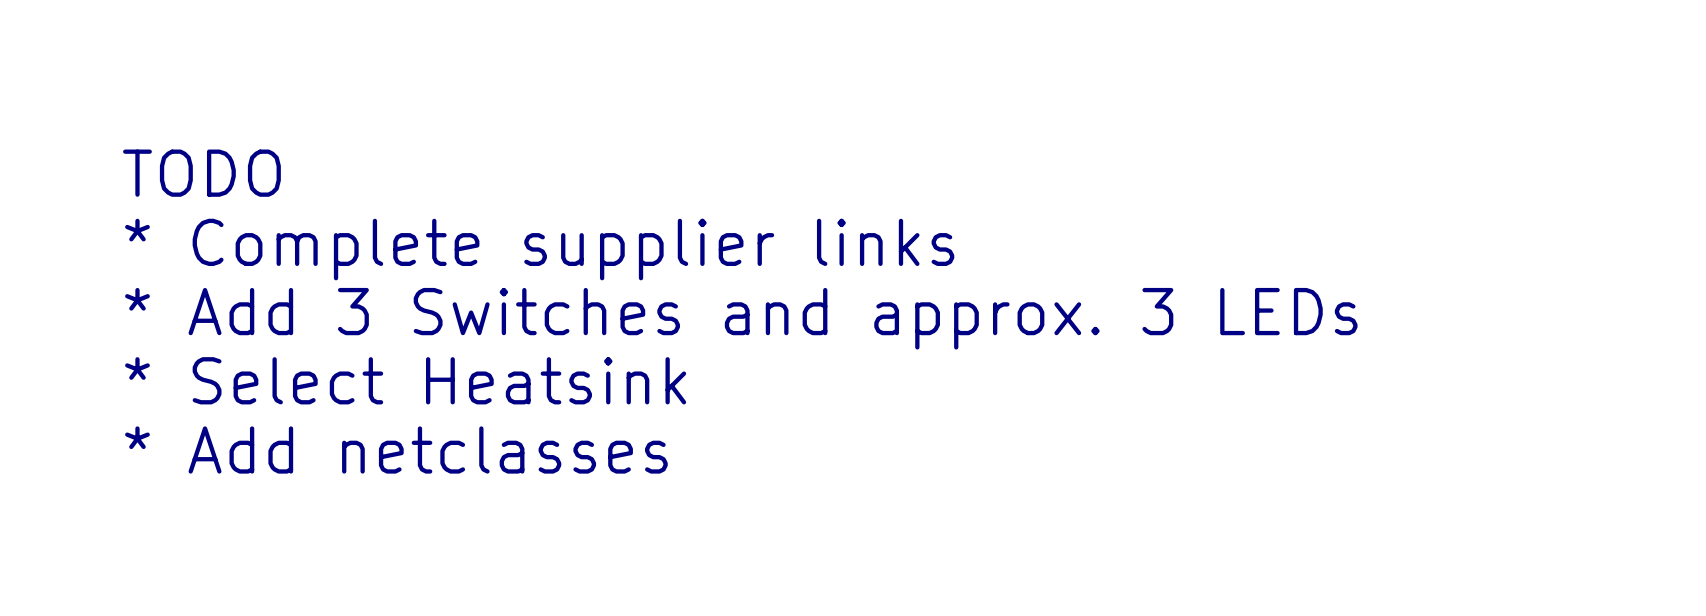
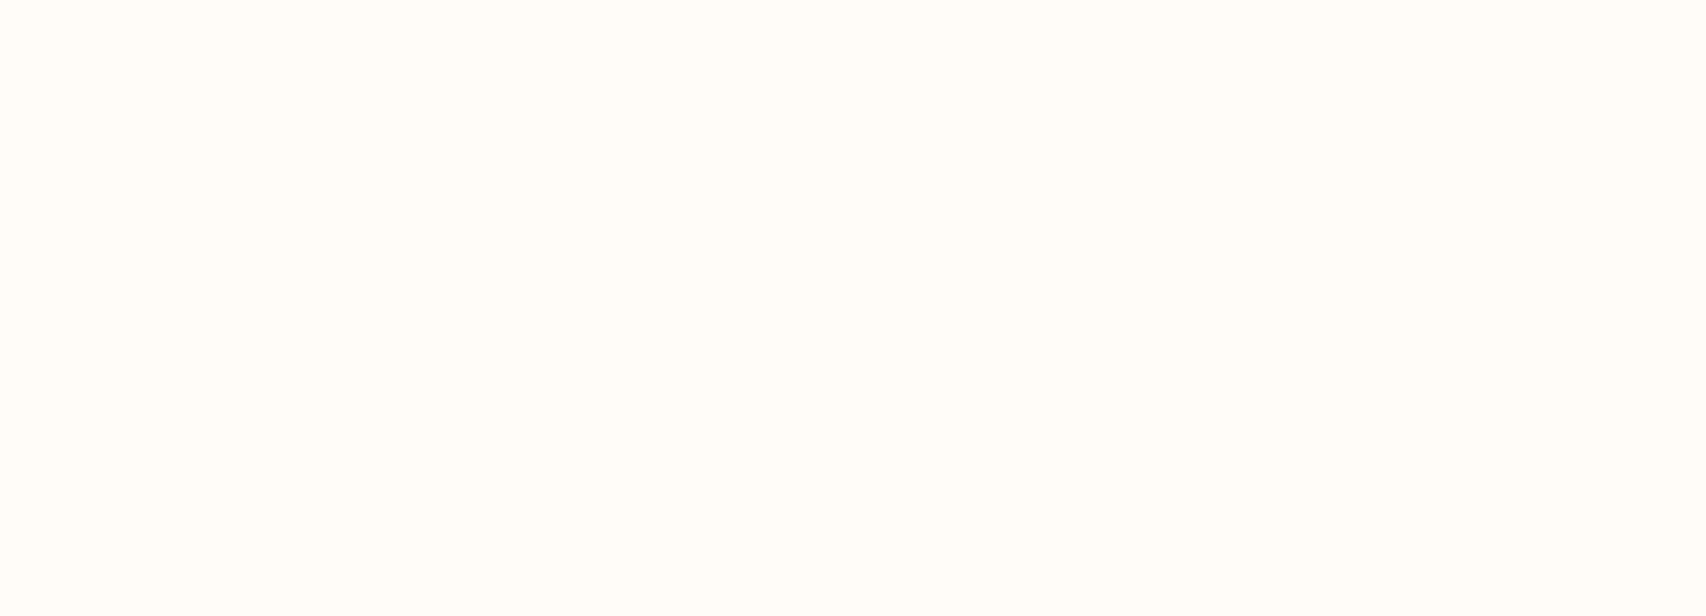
text: TODO (201, 173) -> none
text: * Complete supplier links (539, 249) -> none
text: * Add 3 Switches and approx. 3 LEDs (741, 318) -> none
text: * Select Heatsink (405, 380) -> none
text: * Add netclasses (396, 449) -> none

